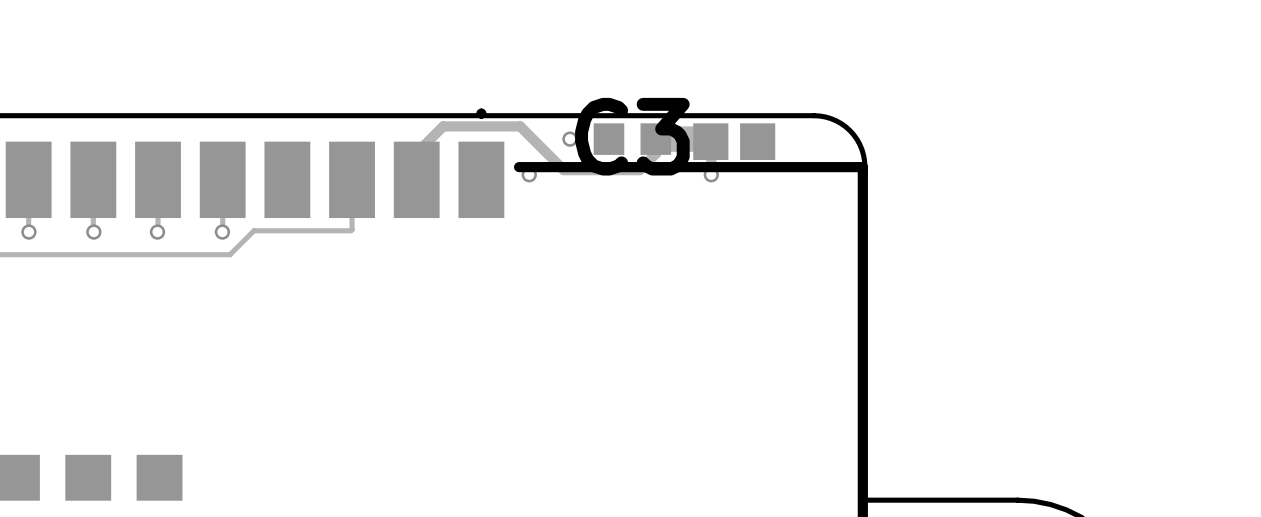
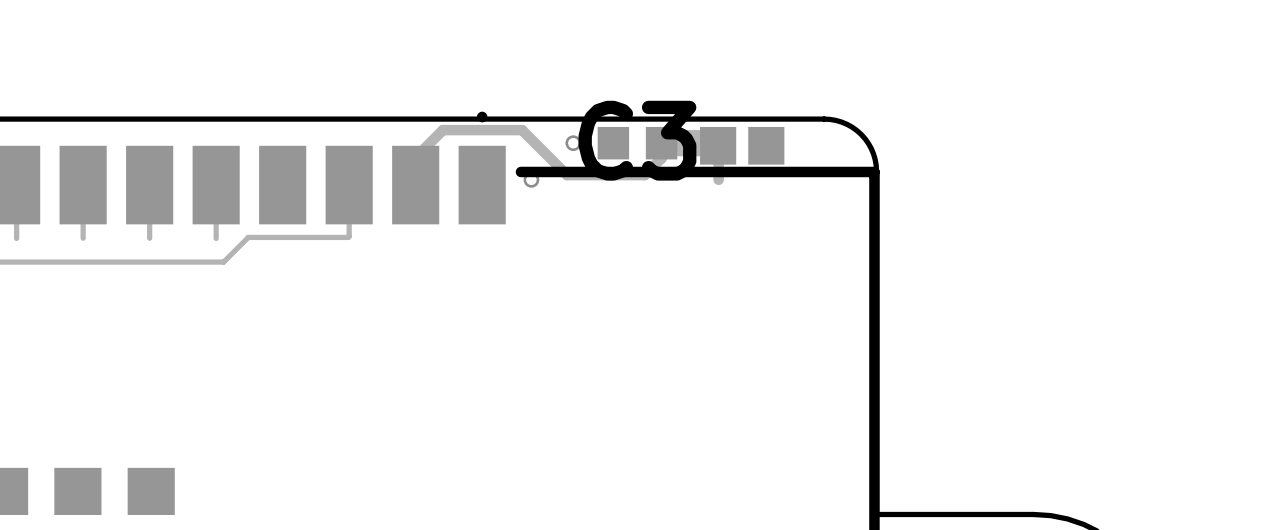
via: (711, 174) -> none
via: (28, 232) -> none
via: (93, 232) -> none
via: (157, 232) -> none
via: (222, 232) -> none

